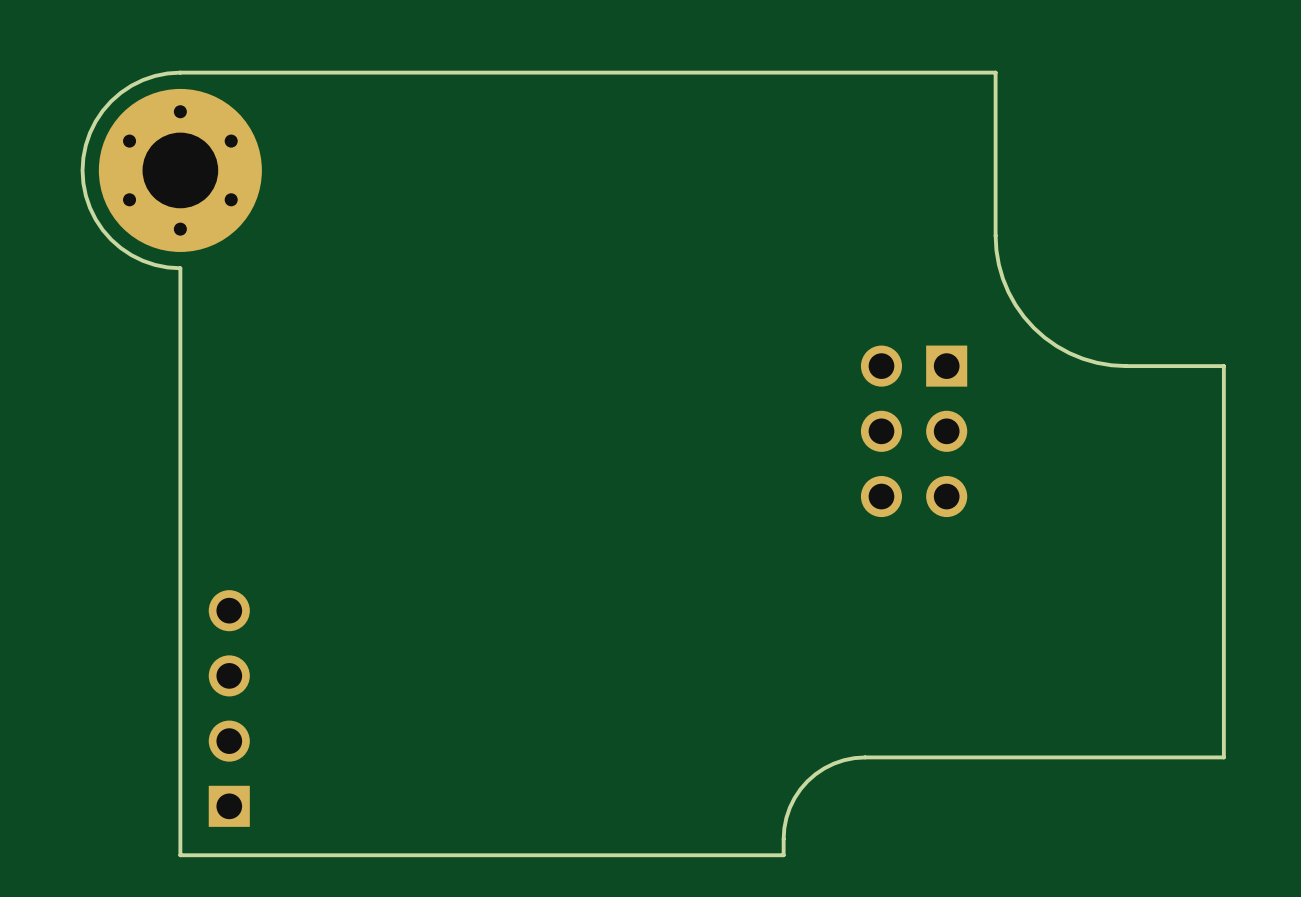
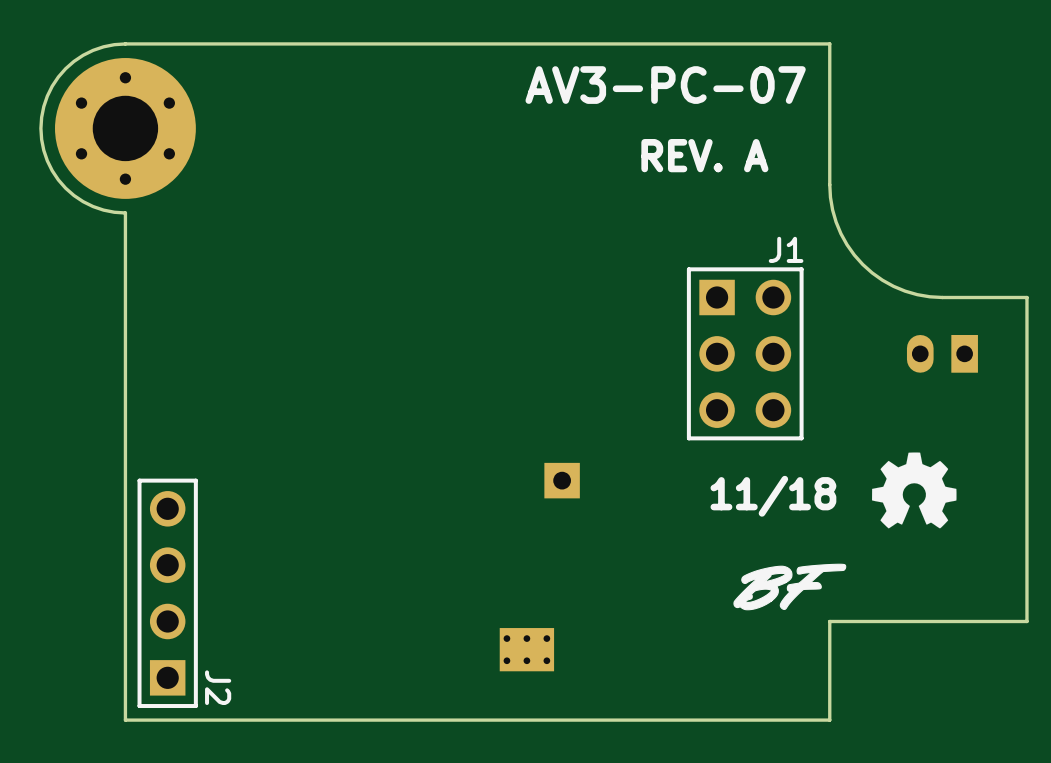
text: none -> AV3-PC-07 (665, 85)
text: none -> REV. A (704, 155)
J1 side: top (914, 431) -> bottom (745, 353)
part: none -> (942, 353)
drawing: none -> [871, 452, 957, 529]
part: none -> (562, 480)
text: none -> 11/18 (773, 496)
drawing: none -> [733, 563, 847, 611]
J2 side: top (229, 708) -> bottom (167, 593)
board edge: (1223, 741) (1223, 757) (865, 757) (844, 760) (815, 774) (794, 798) (784, 828) (783, 855) -> (1026, 621) (829, 621) (829, 720) (646, 720)
part: none -> (526, 649)

